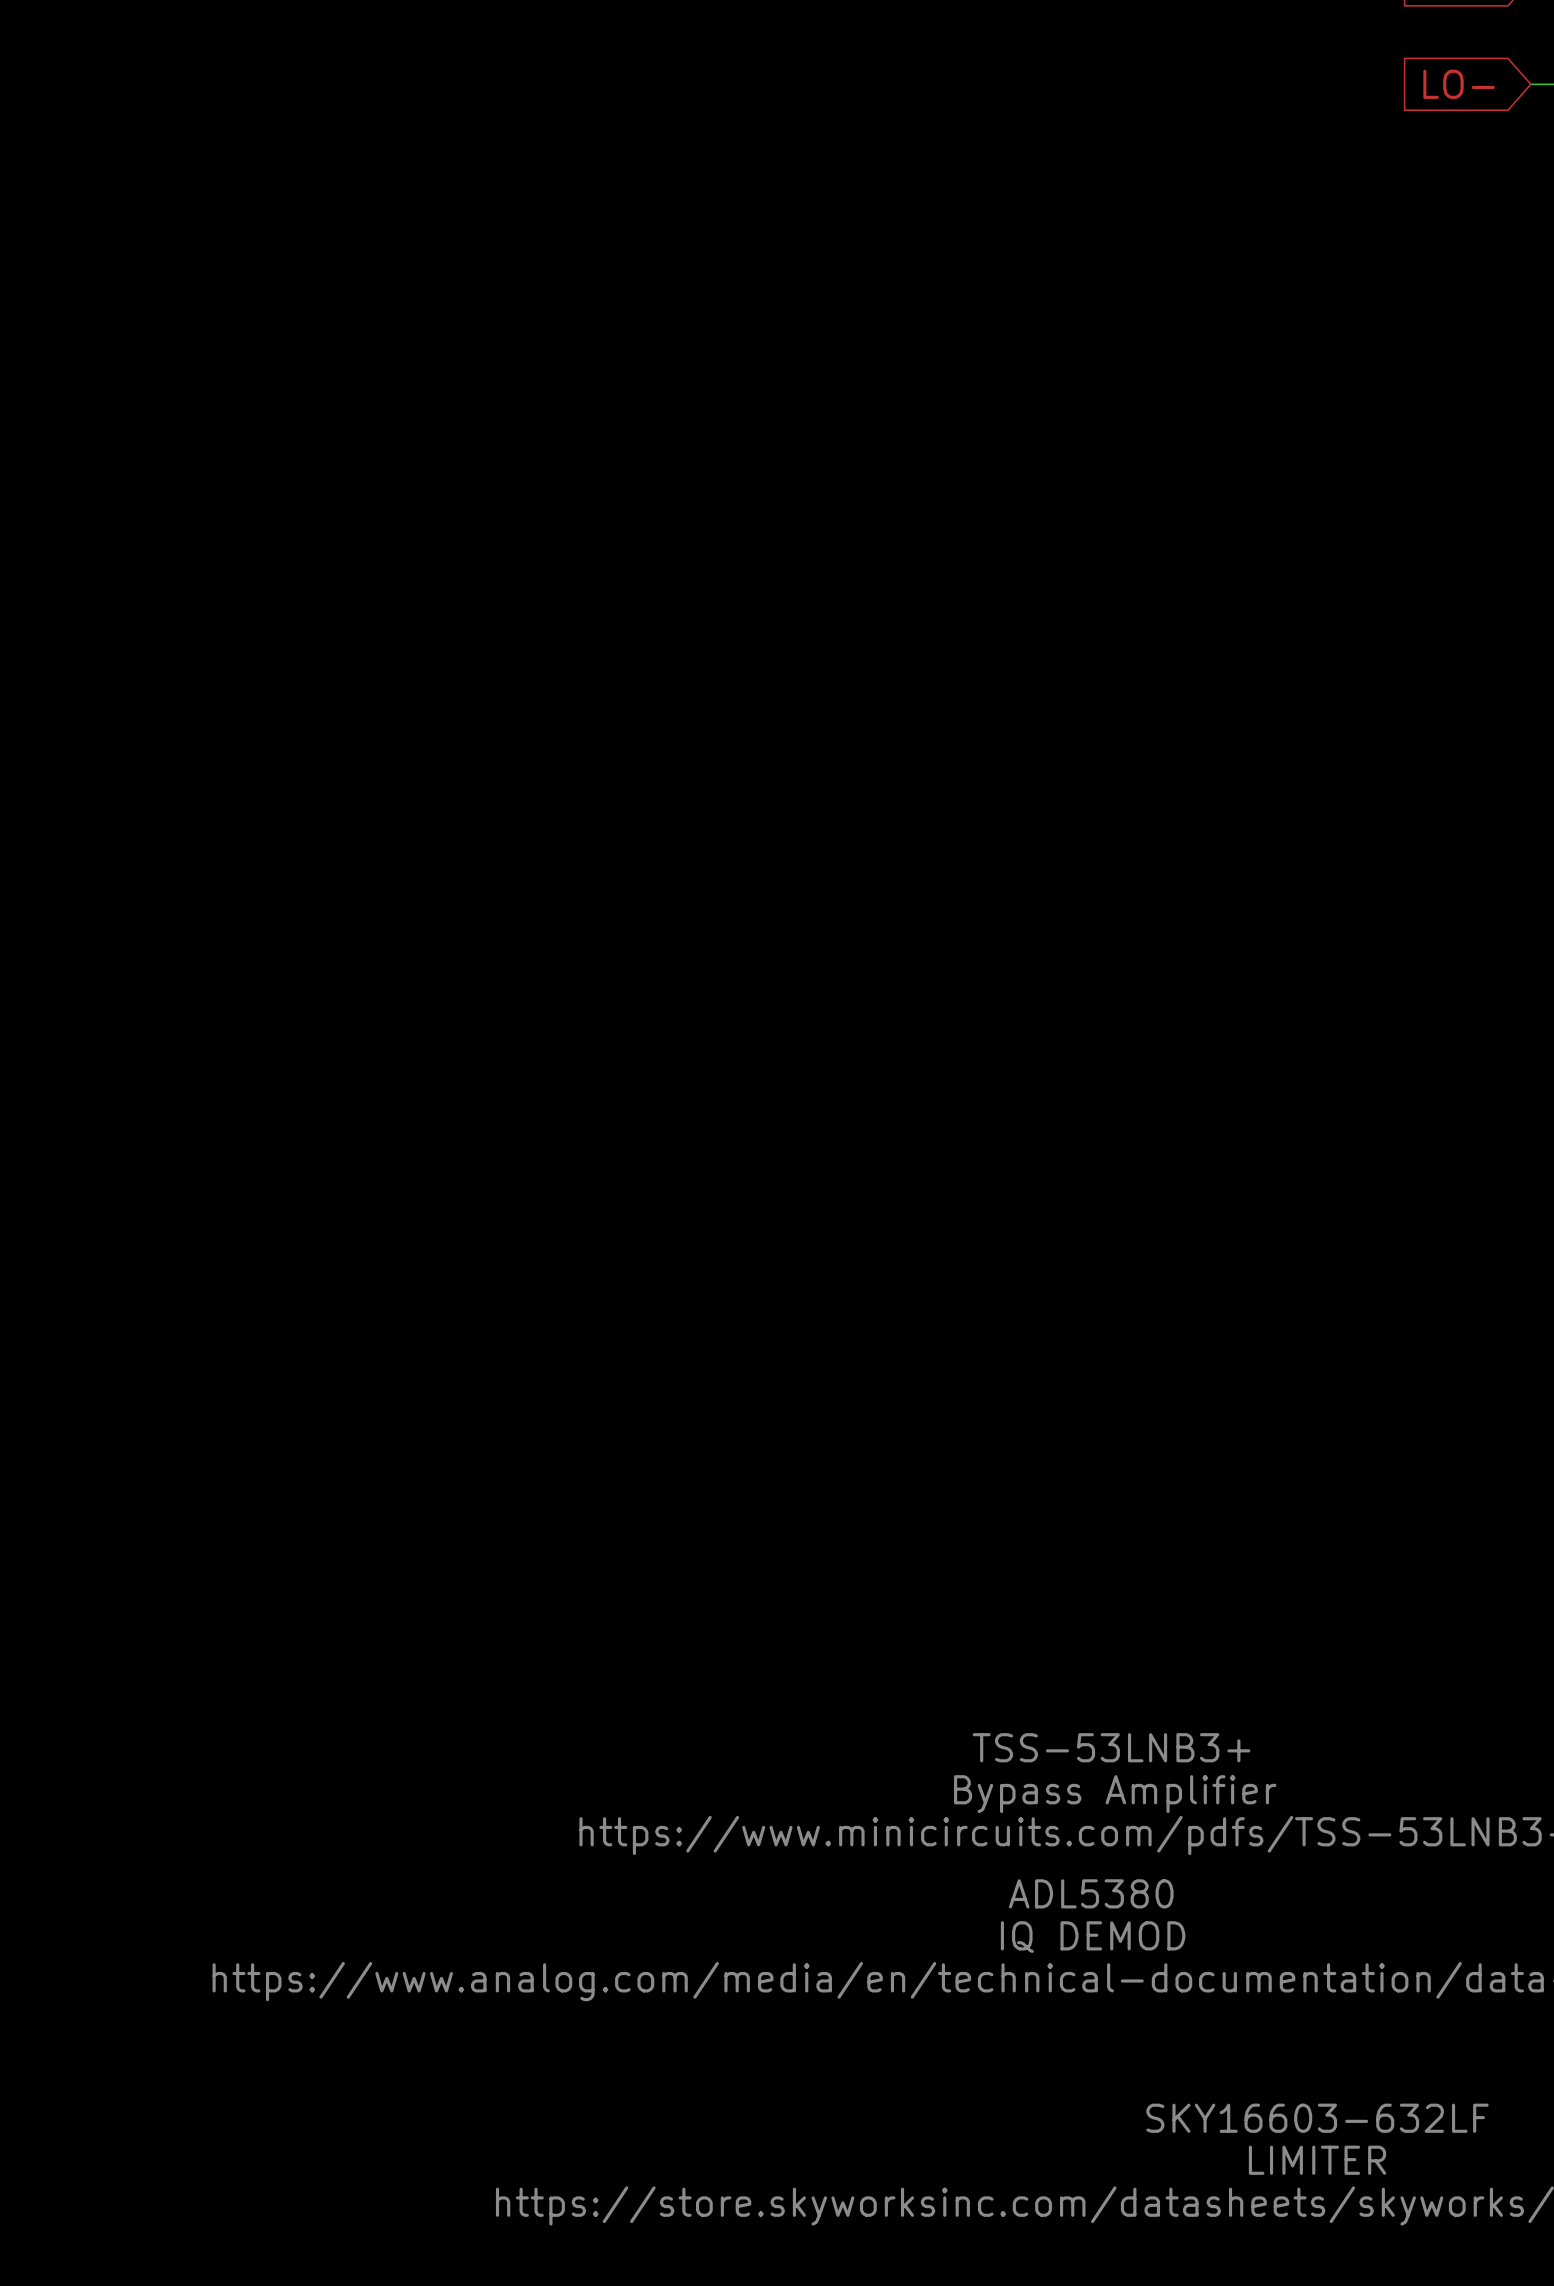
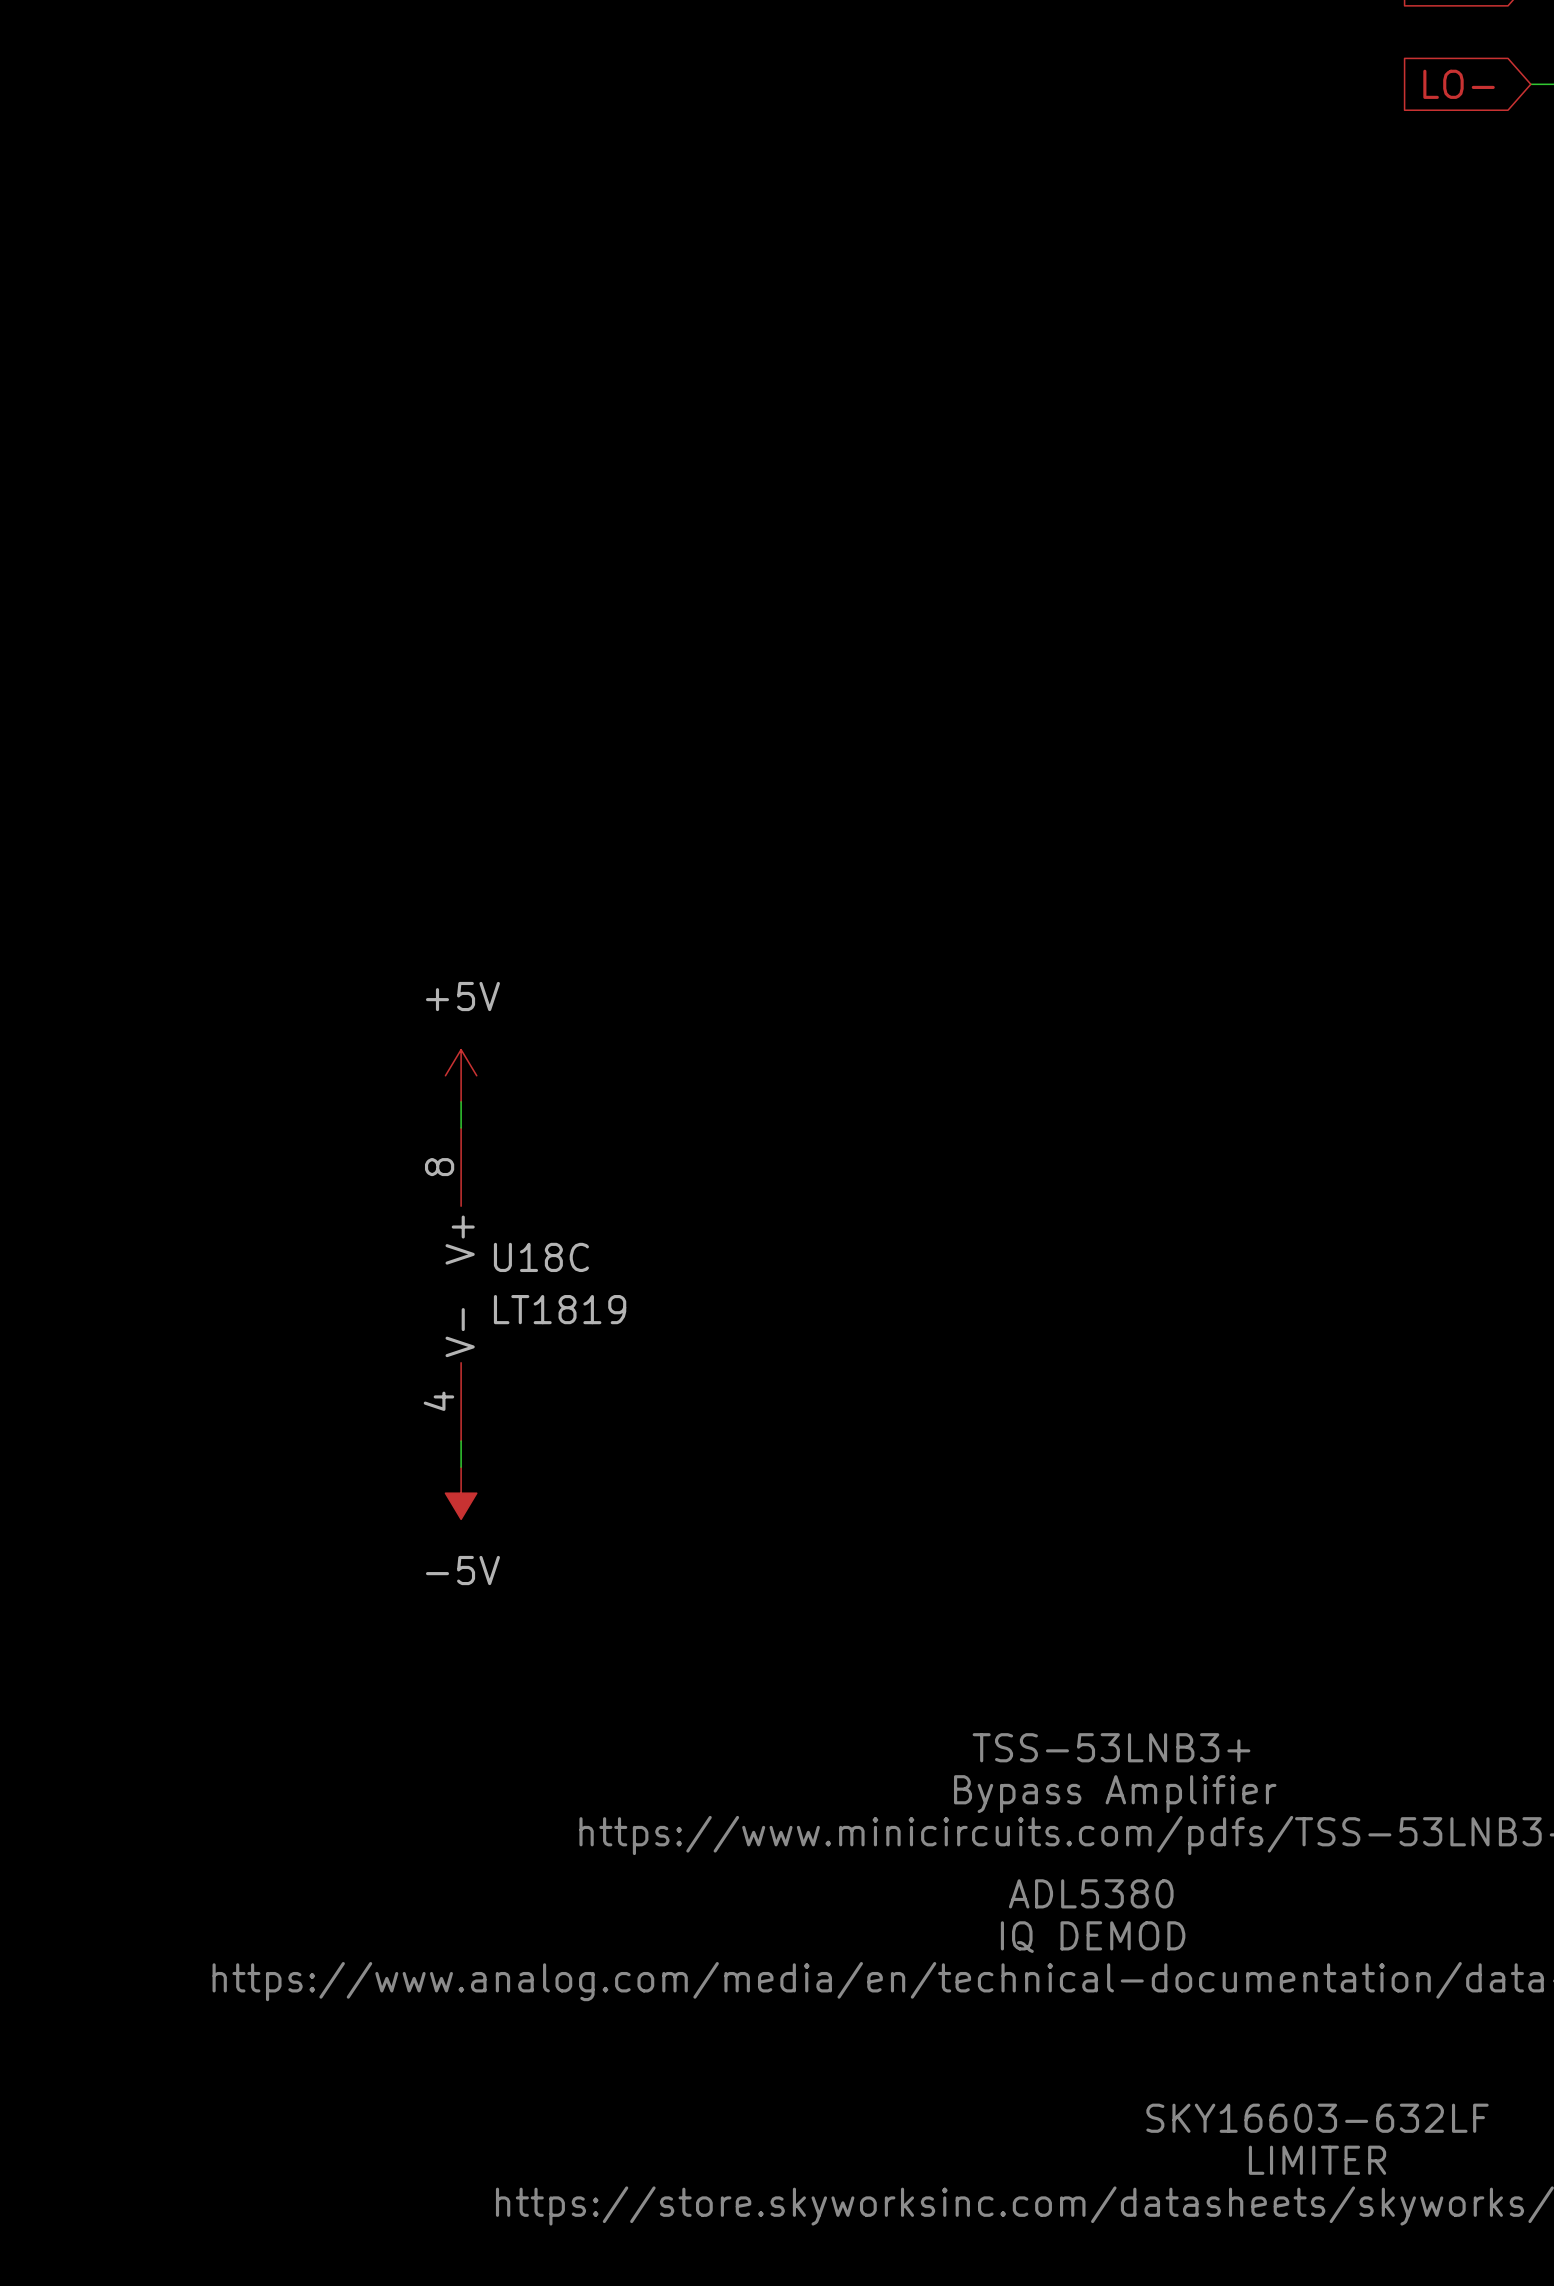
power symbol: none -> +5V (461, 1075)
wire: none -> (461, 1101) (461, 1127)
U18C: none -> LT1819 (461, 1284)
wire: none -> (461, 1441) (461, 1467)
power symbol: none -> -5V (461, 1493)

